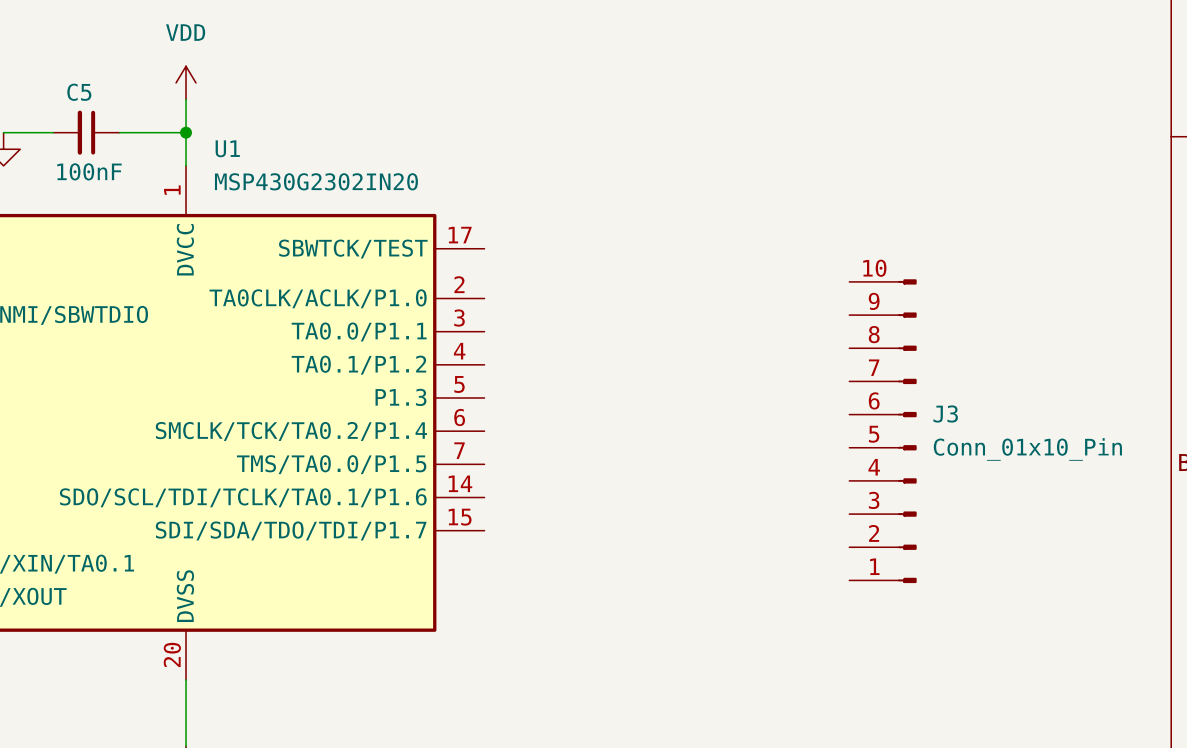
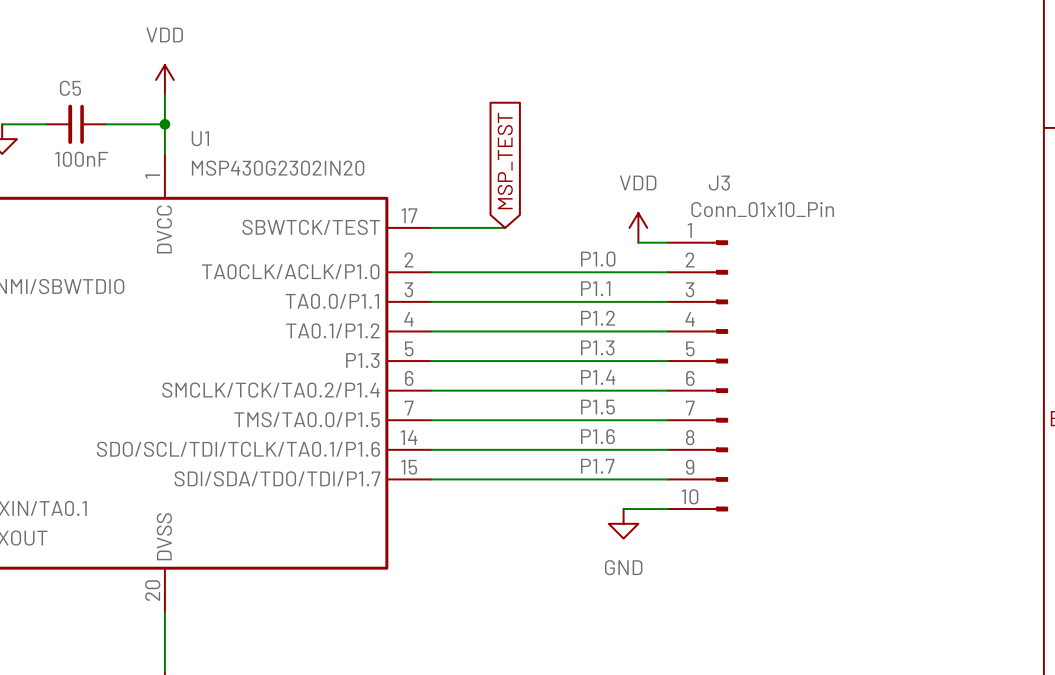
global label: none -> MSP_TEST (505, 161)
wire: none -> (431, 227) (505, 227)
power symbol: none -> VDD (638, 227)
wire: none -> (638, 242) (667, 242)
label: none -> P1.0 (598, 259)
wire: none -> (431, 272) (667, 272)
label: none -> P1.1 (595, 288)
wire: none -> (431, 301) (667, 301)
label: none -> P1.2 (598, 318)
wire: none -> (431, 331) (667, 331)
label: none -> P1.3 (597, 347)
wire: none -> (431, 361) (667, 361)
J3 name position: J3 (945, 413) -> J3 (719, 183)
label: none -> P1.4 (598, 377)
wire: none -> (431, 390) (667, 390)
J3 flip: as is (907, 431) -> up-down (719, 375)
label: none -> P1.5 (597, 407)
J3 value position: Conn_01x10_Pin (1027, 449) -> Conn_01x10_Pin (762, 209)
wire: none -> (431, 420) (667, 420)
label: none -> P1.6 (597, 436)
wire: none -> (431, 449) (667, 449)
label: none -> P1.7 (597, 466)
wire: none -> (431, 479) (667, 479)
wire: none -> (623, 509) (667, 509)
power symbol: none -> GND (623, 523)

